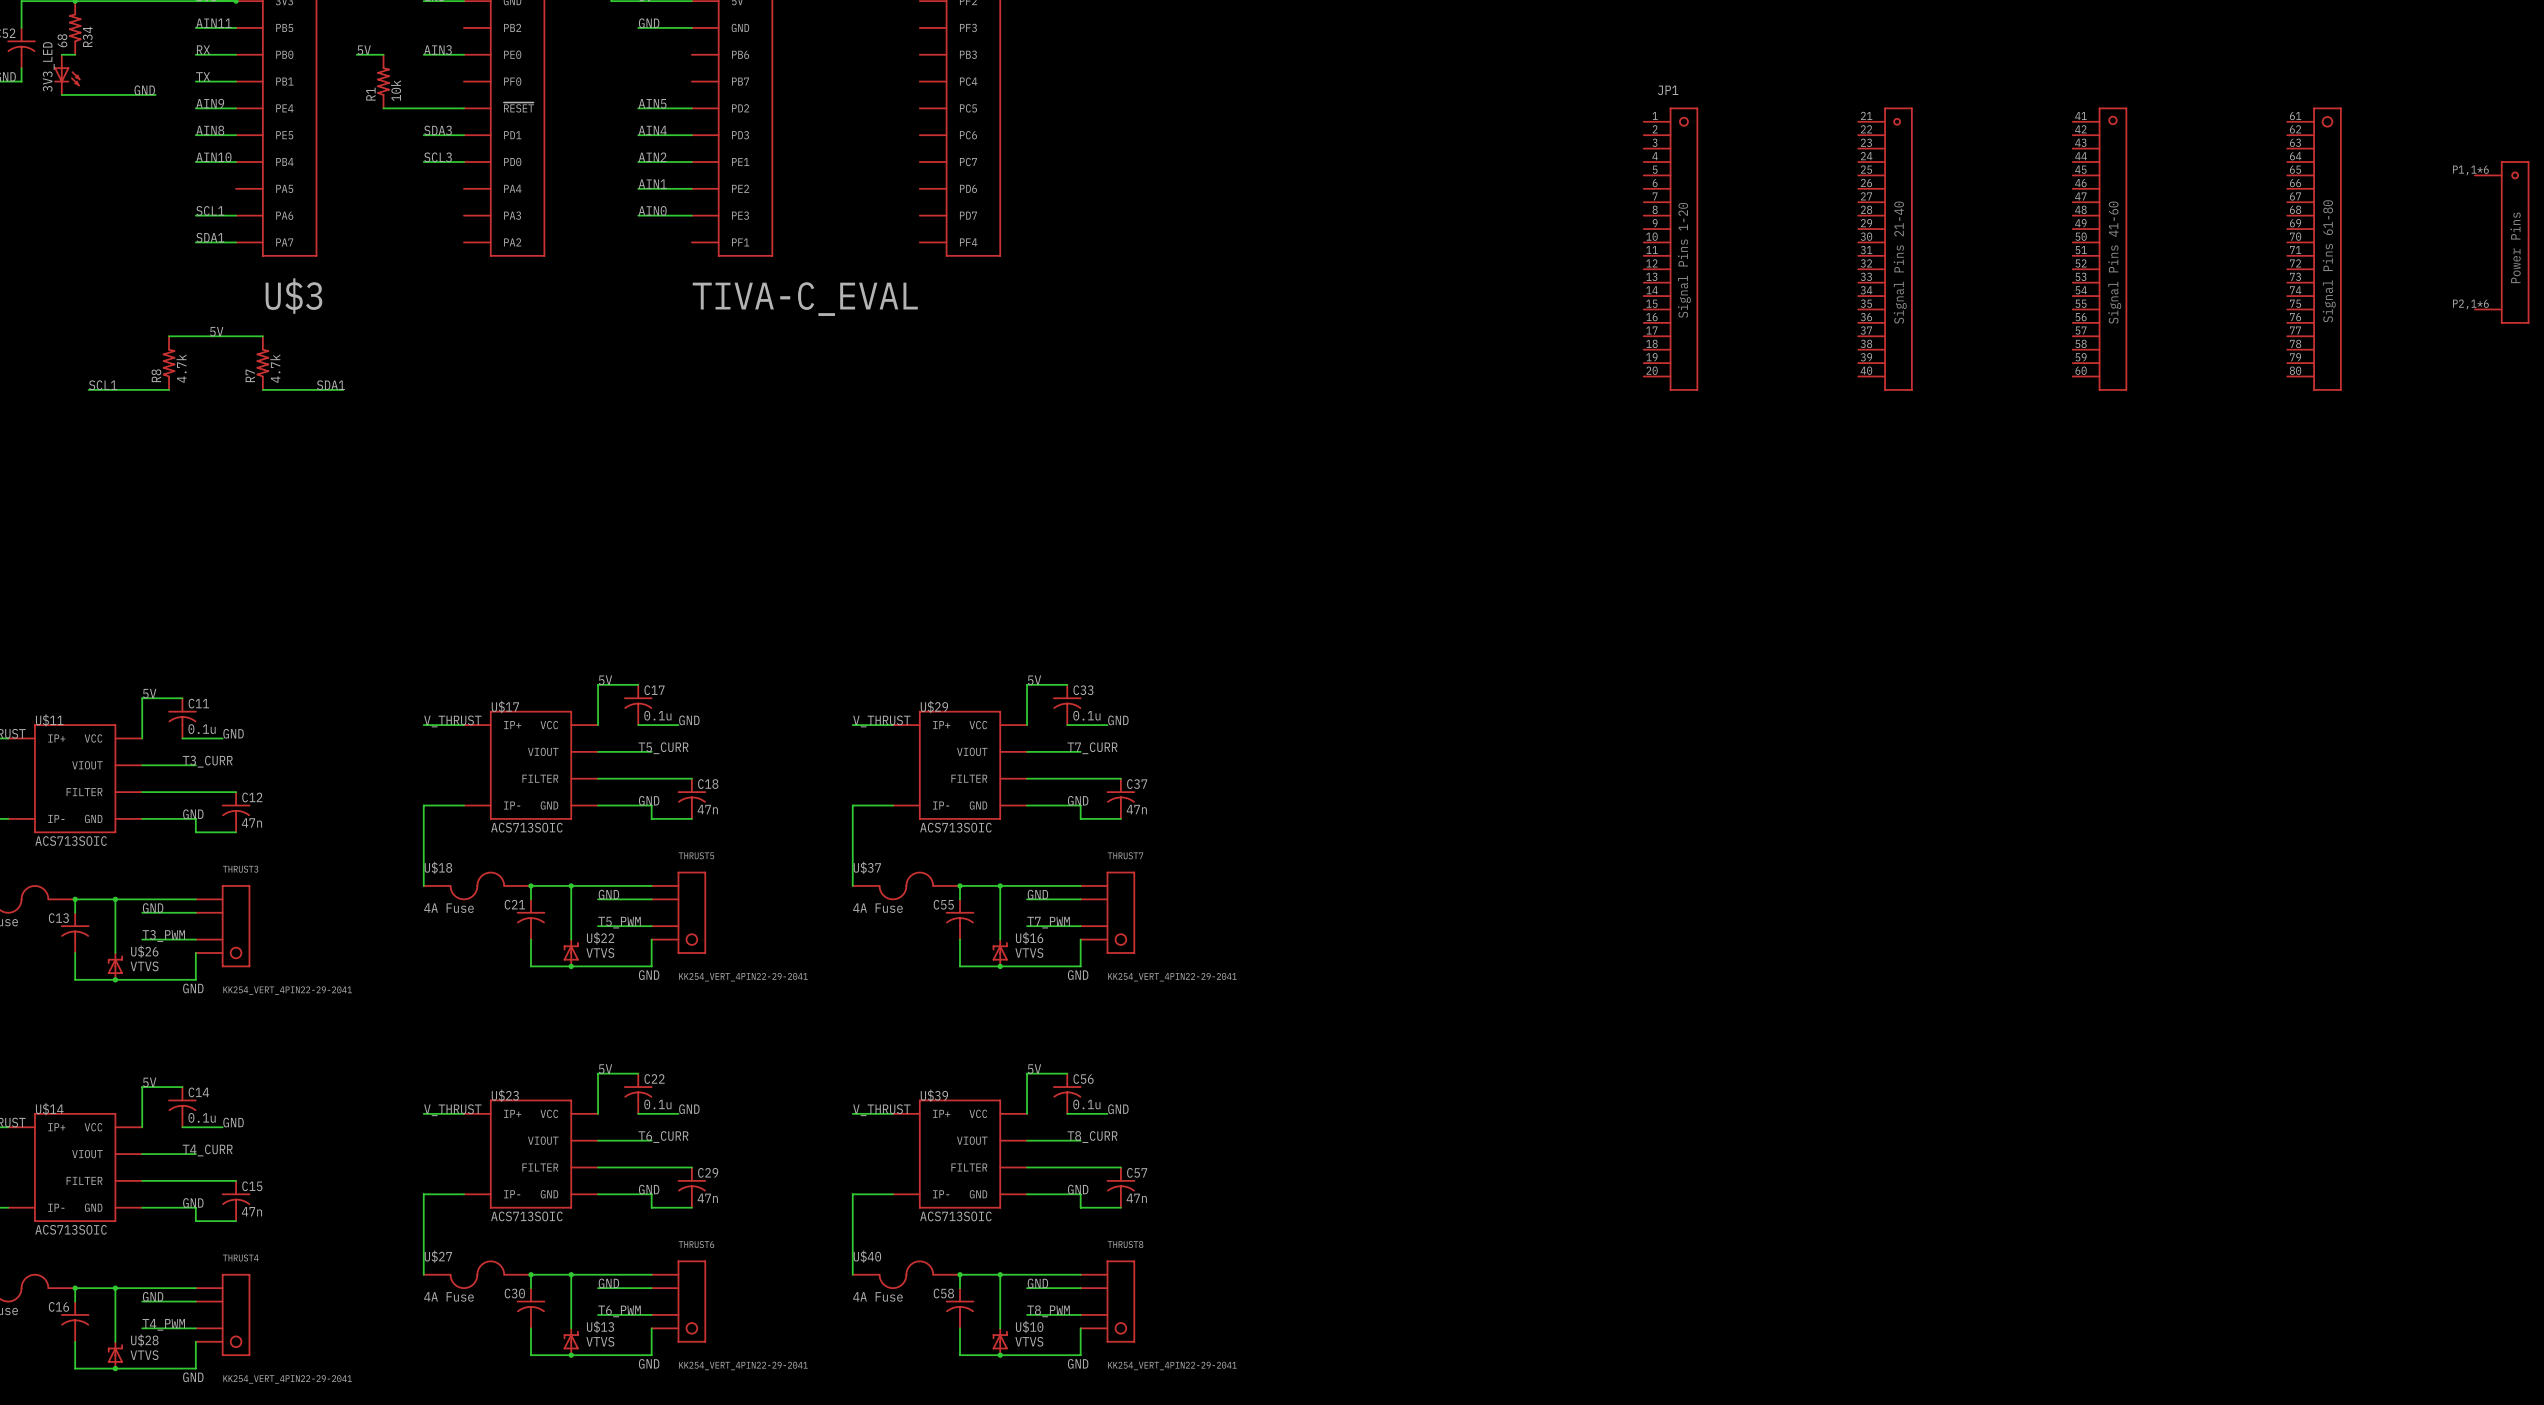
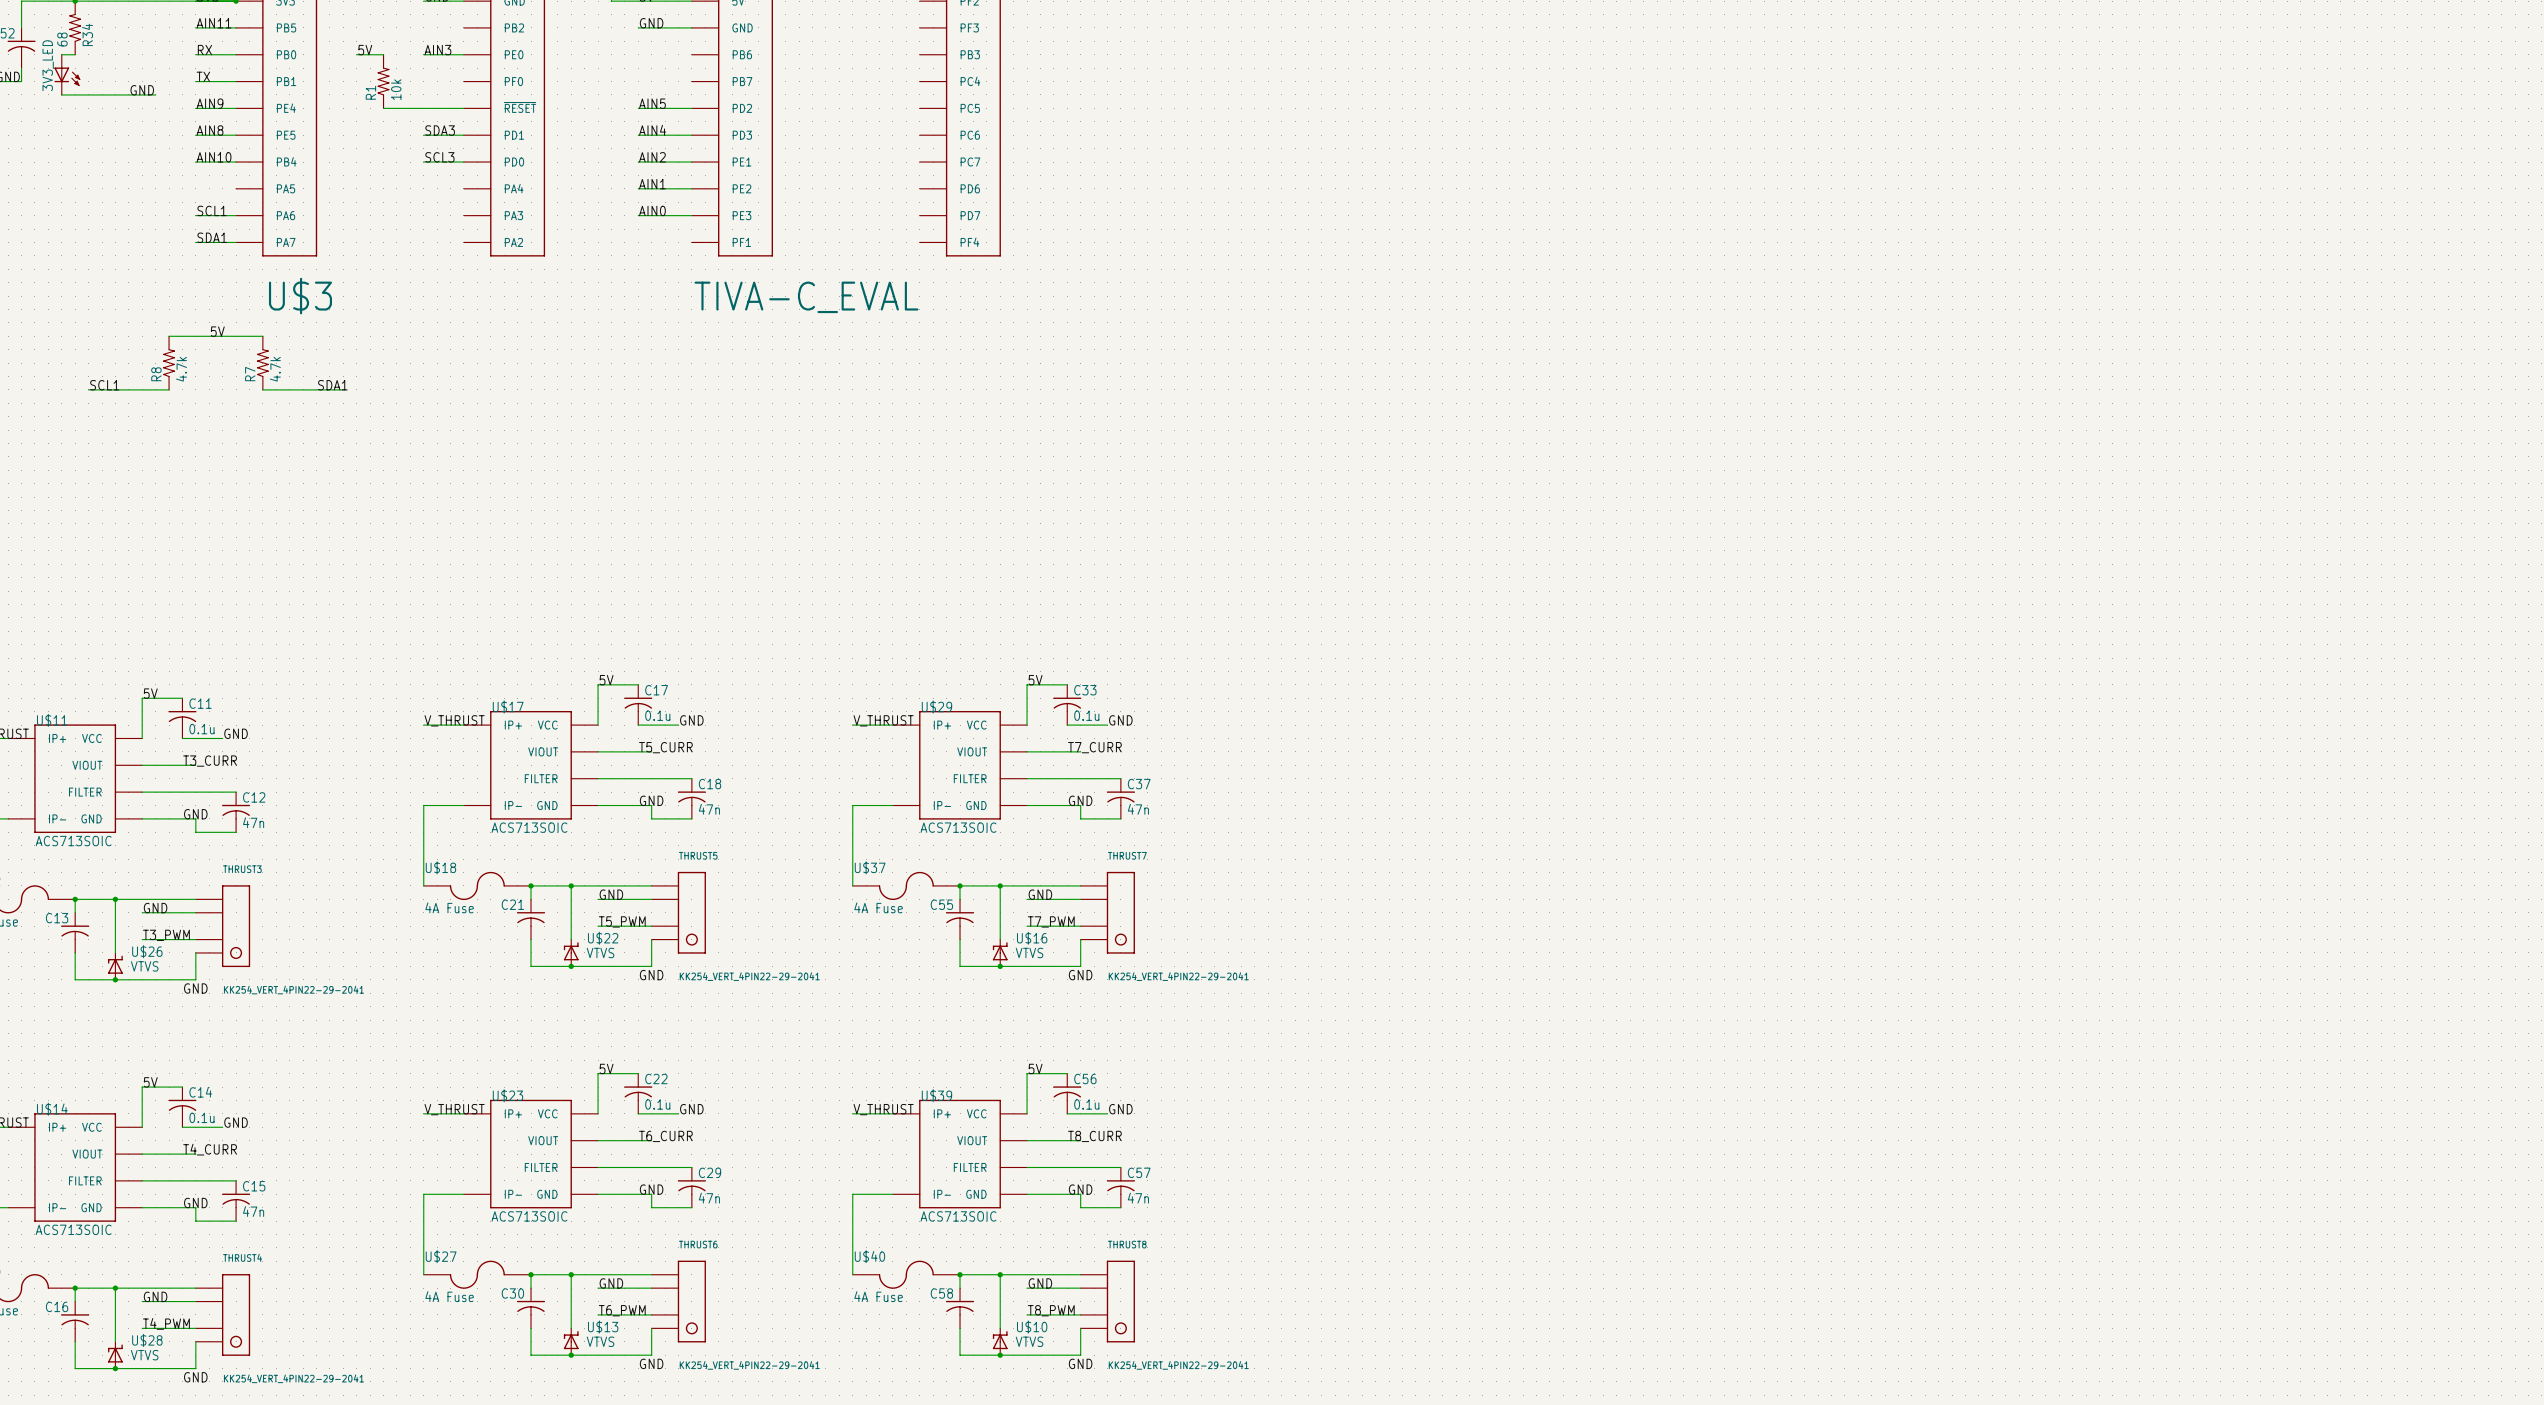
JP1: (2086, 249) -> none

